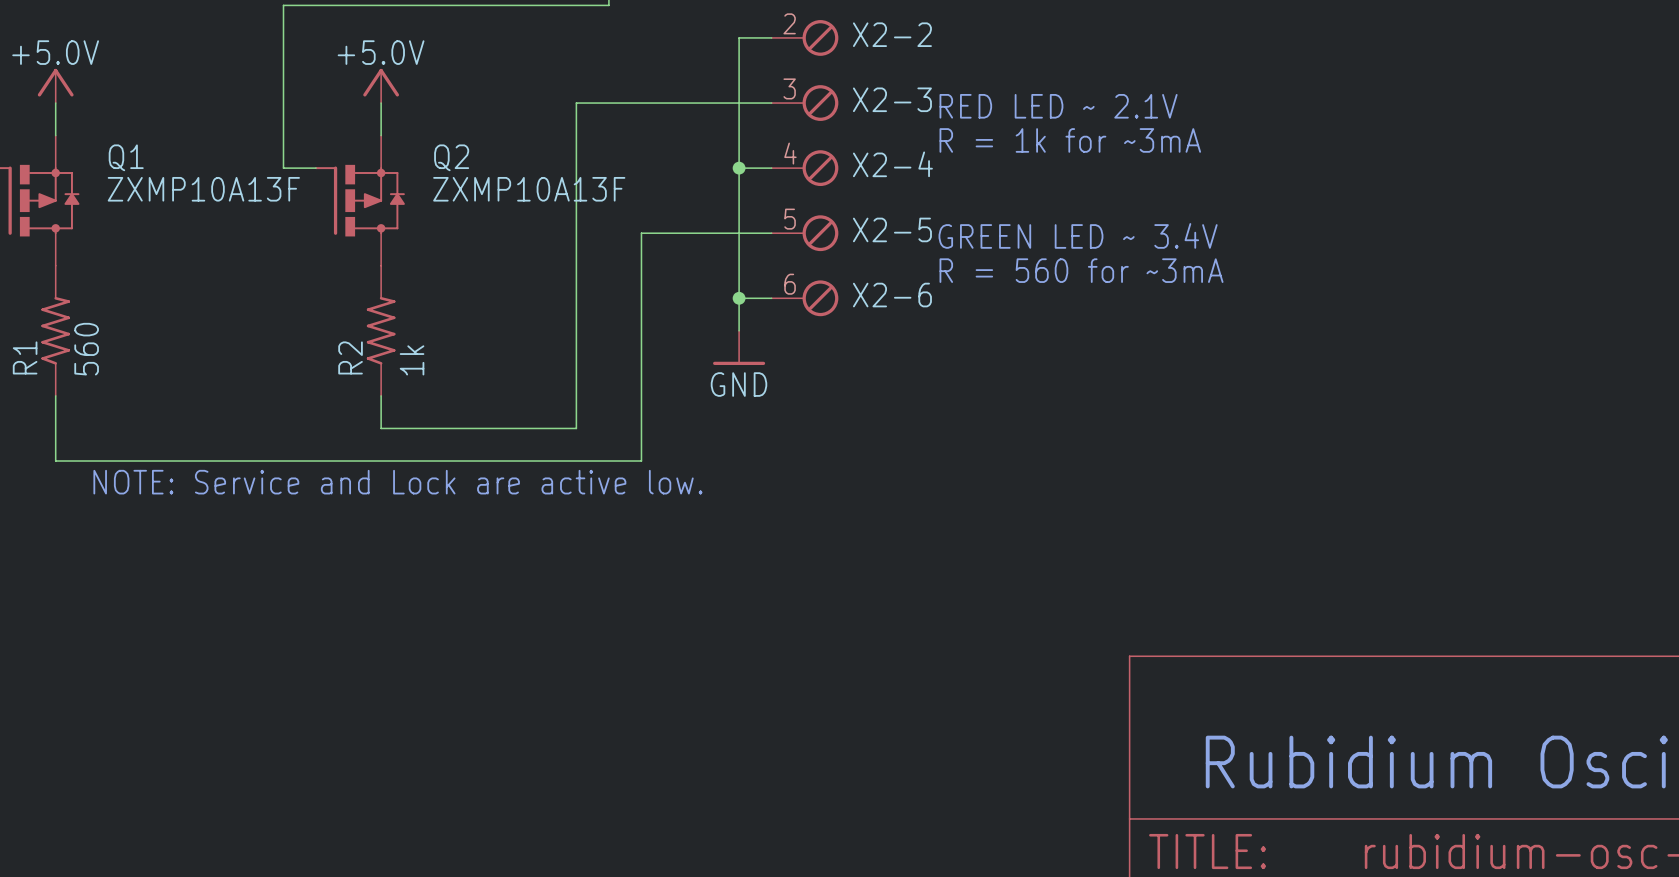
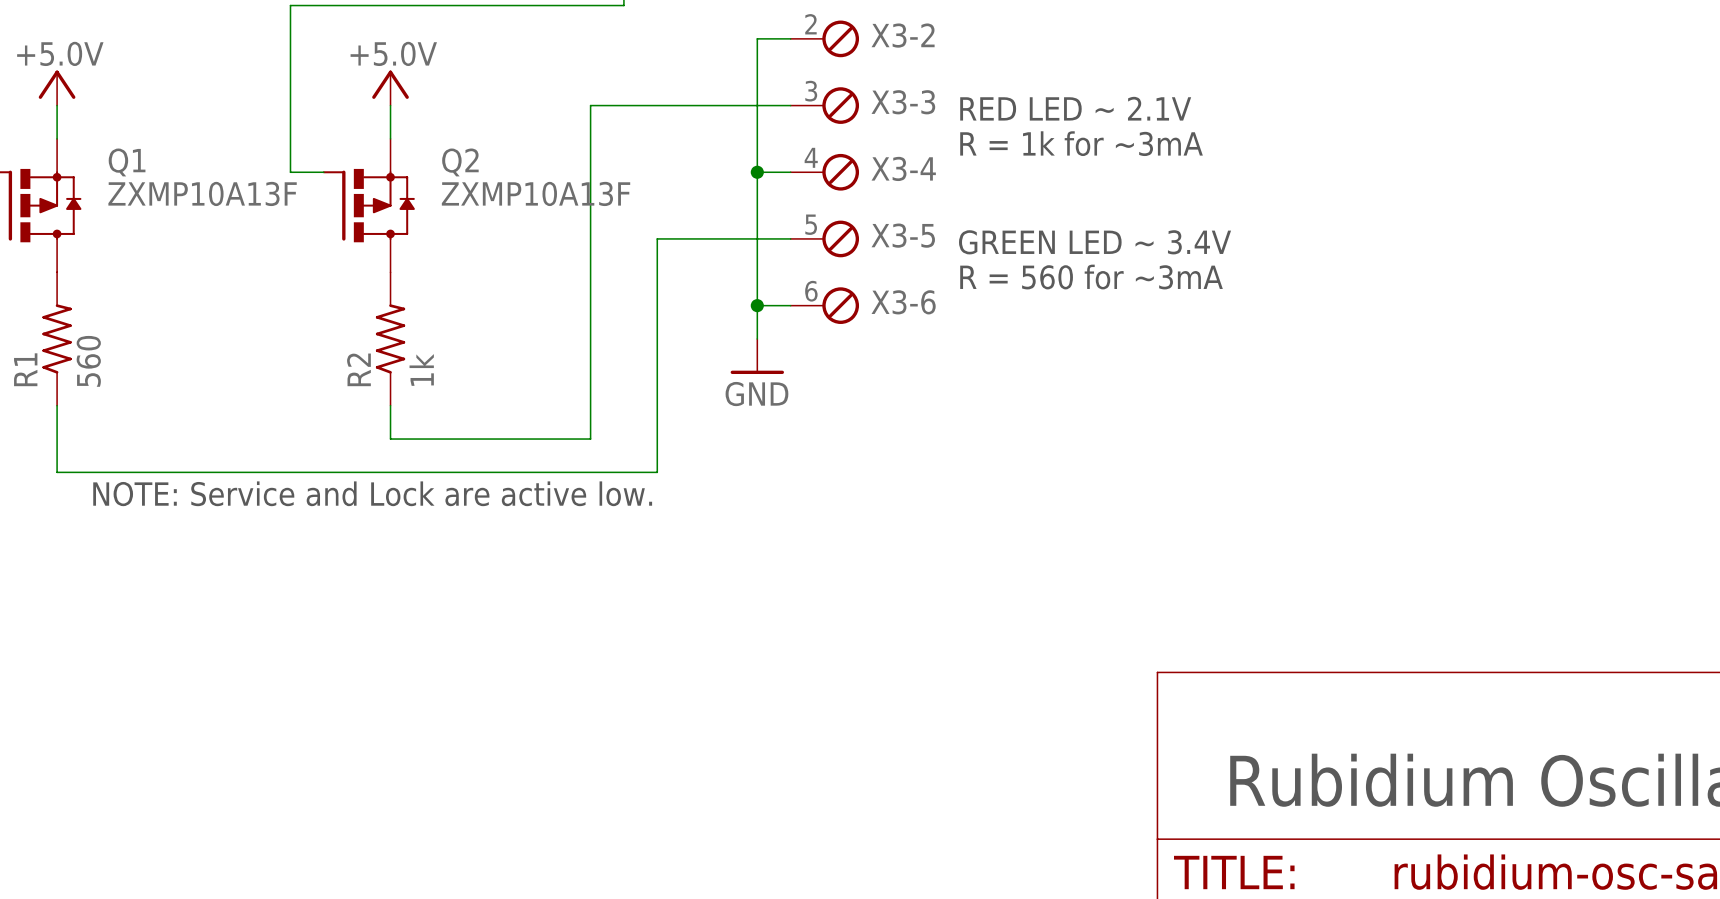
X2-2 name: X2-2 (892, 34) -> X3-2 (903, 35)
X2-3 name: X2-3 (892, 99) -> X3-3 (903, 102)
X2-4 name: X2-4 (892, 164) -> X3-4 (903, 168)
X2-5 name: X2-5 (892, 229) -> X3-5 (903, 235)
X2-6 name: X2-6 (892, 295) -> X3-6 (903, 302)

